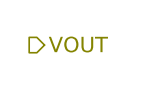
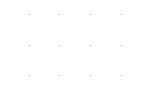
hierarchical label: VOUT (78, 44) -> none

